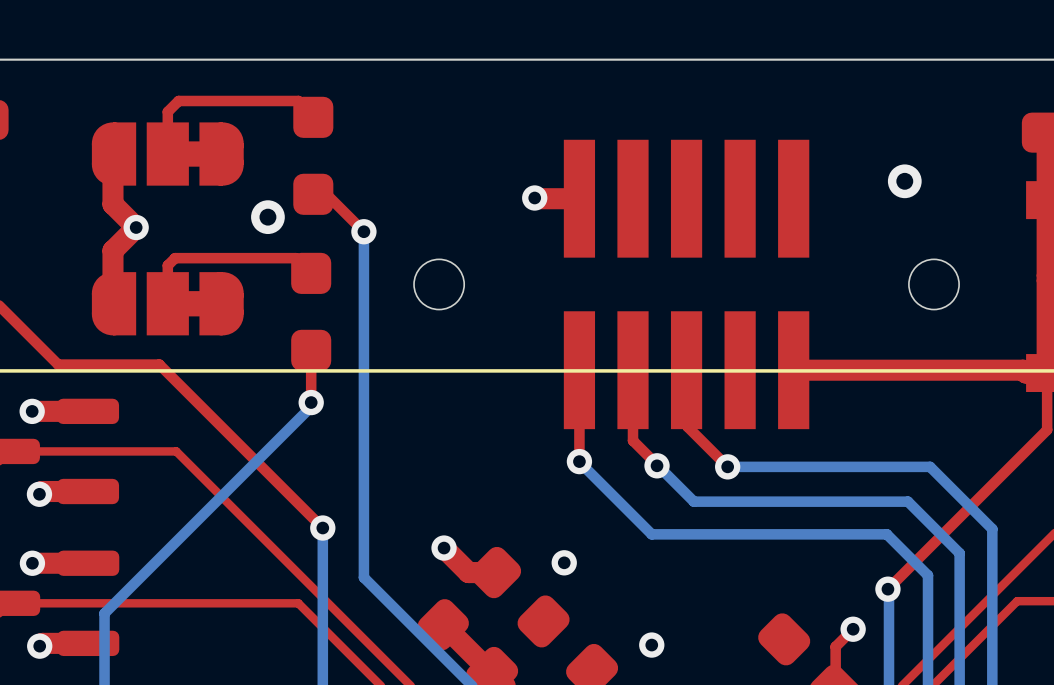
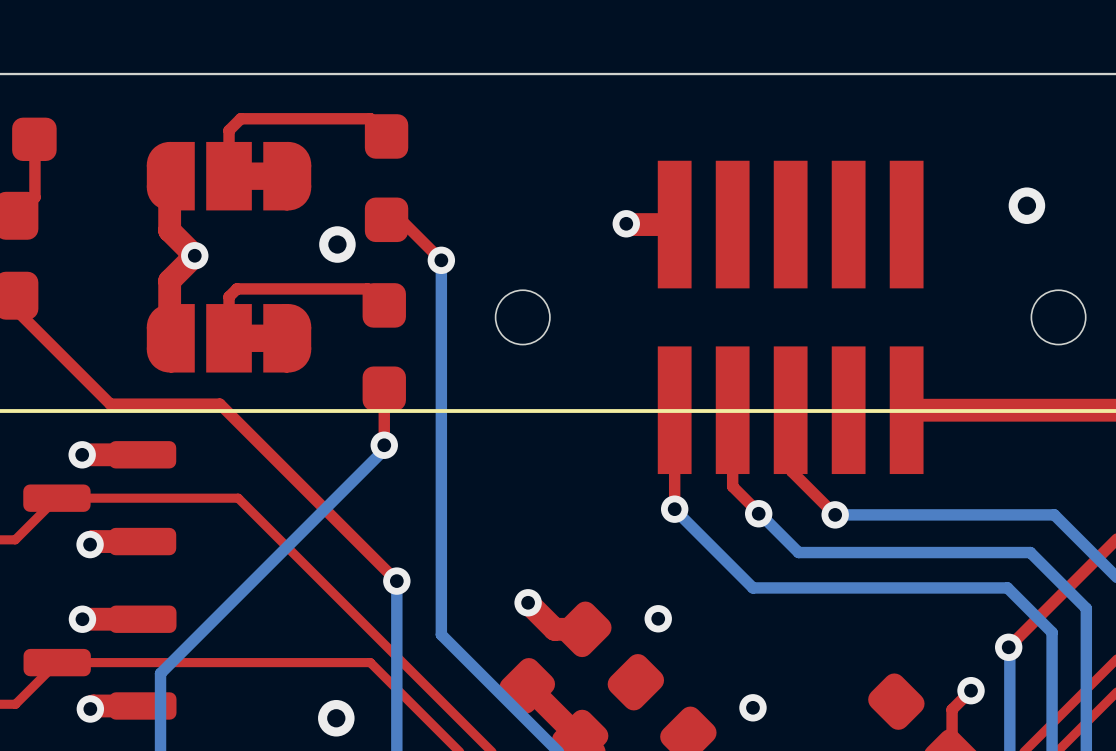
via: none -> (336, 718)

